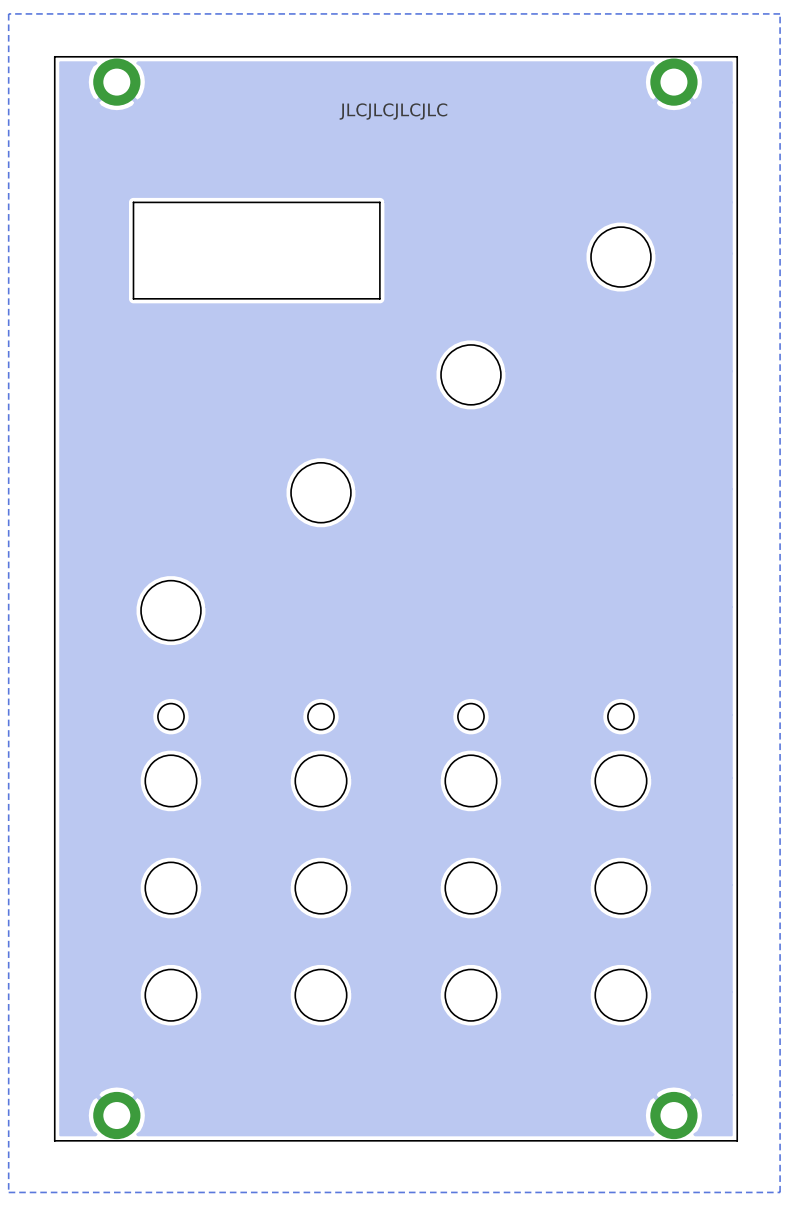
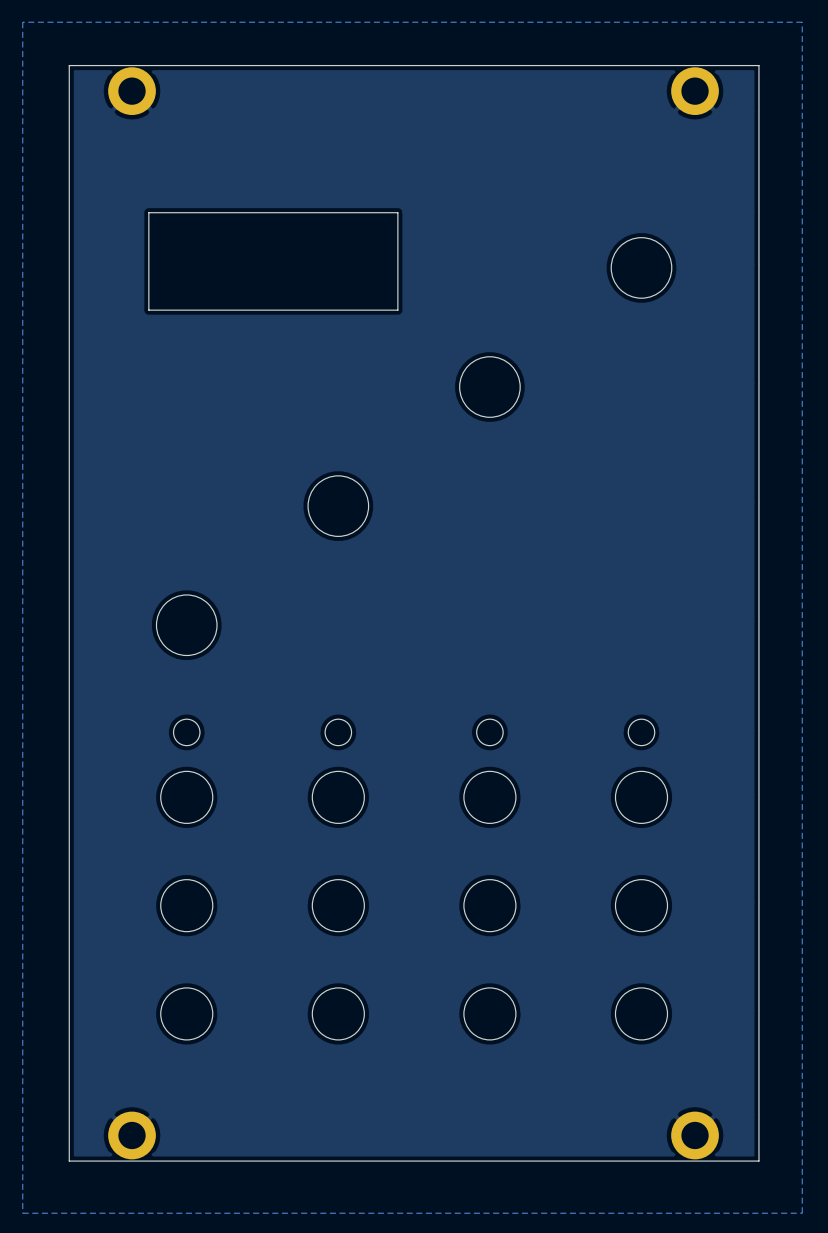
text: JLCJLCJLCJLC (393, 111) -> none

